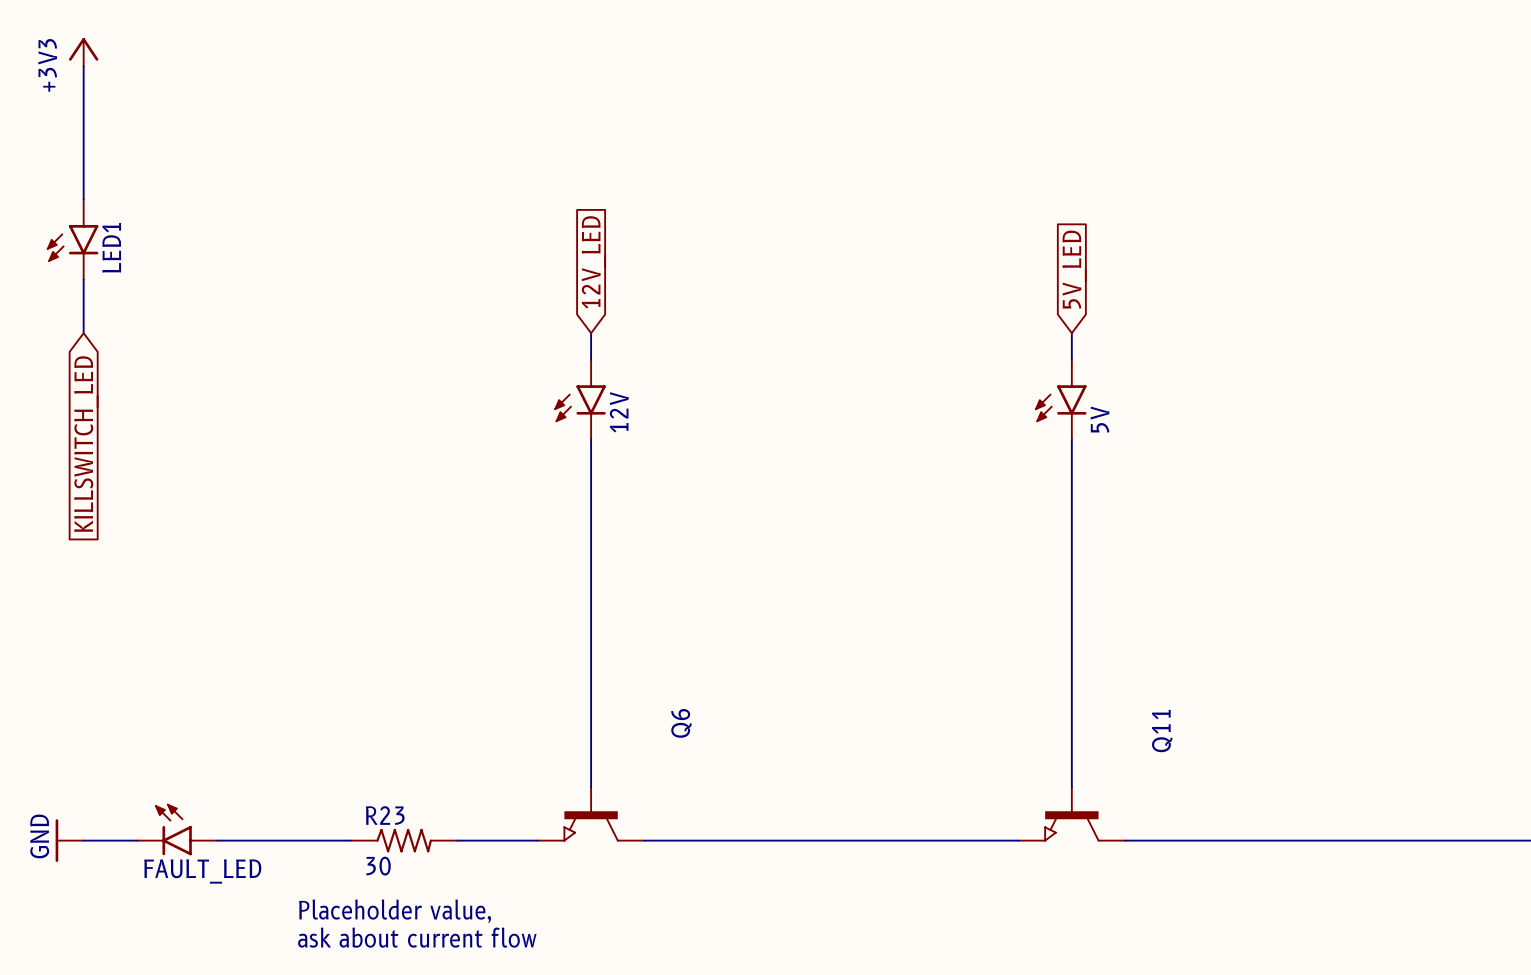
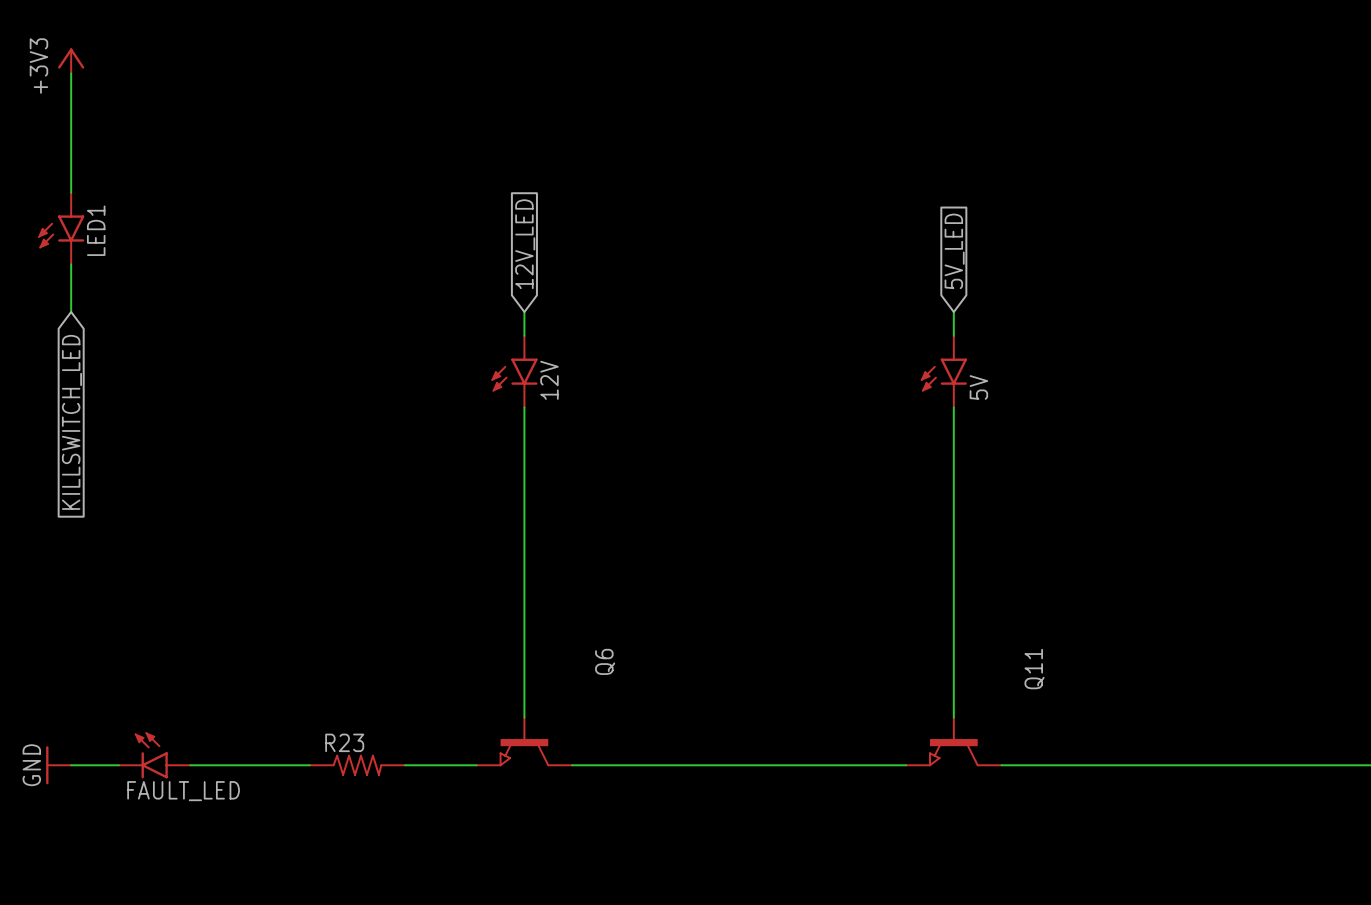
R23 value: 30 (378, 866) -> none
text: Placeholder value, (395, 911) -> none
text: ask about current flow (417, 937) -> none

